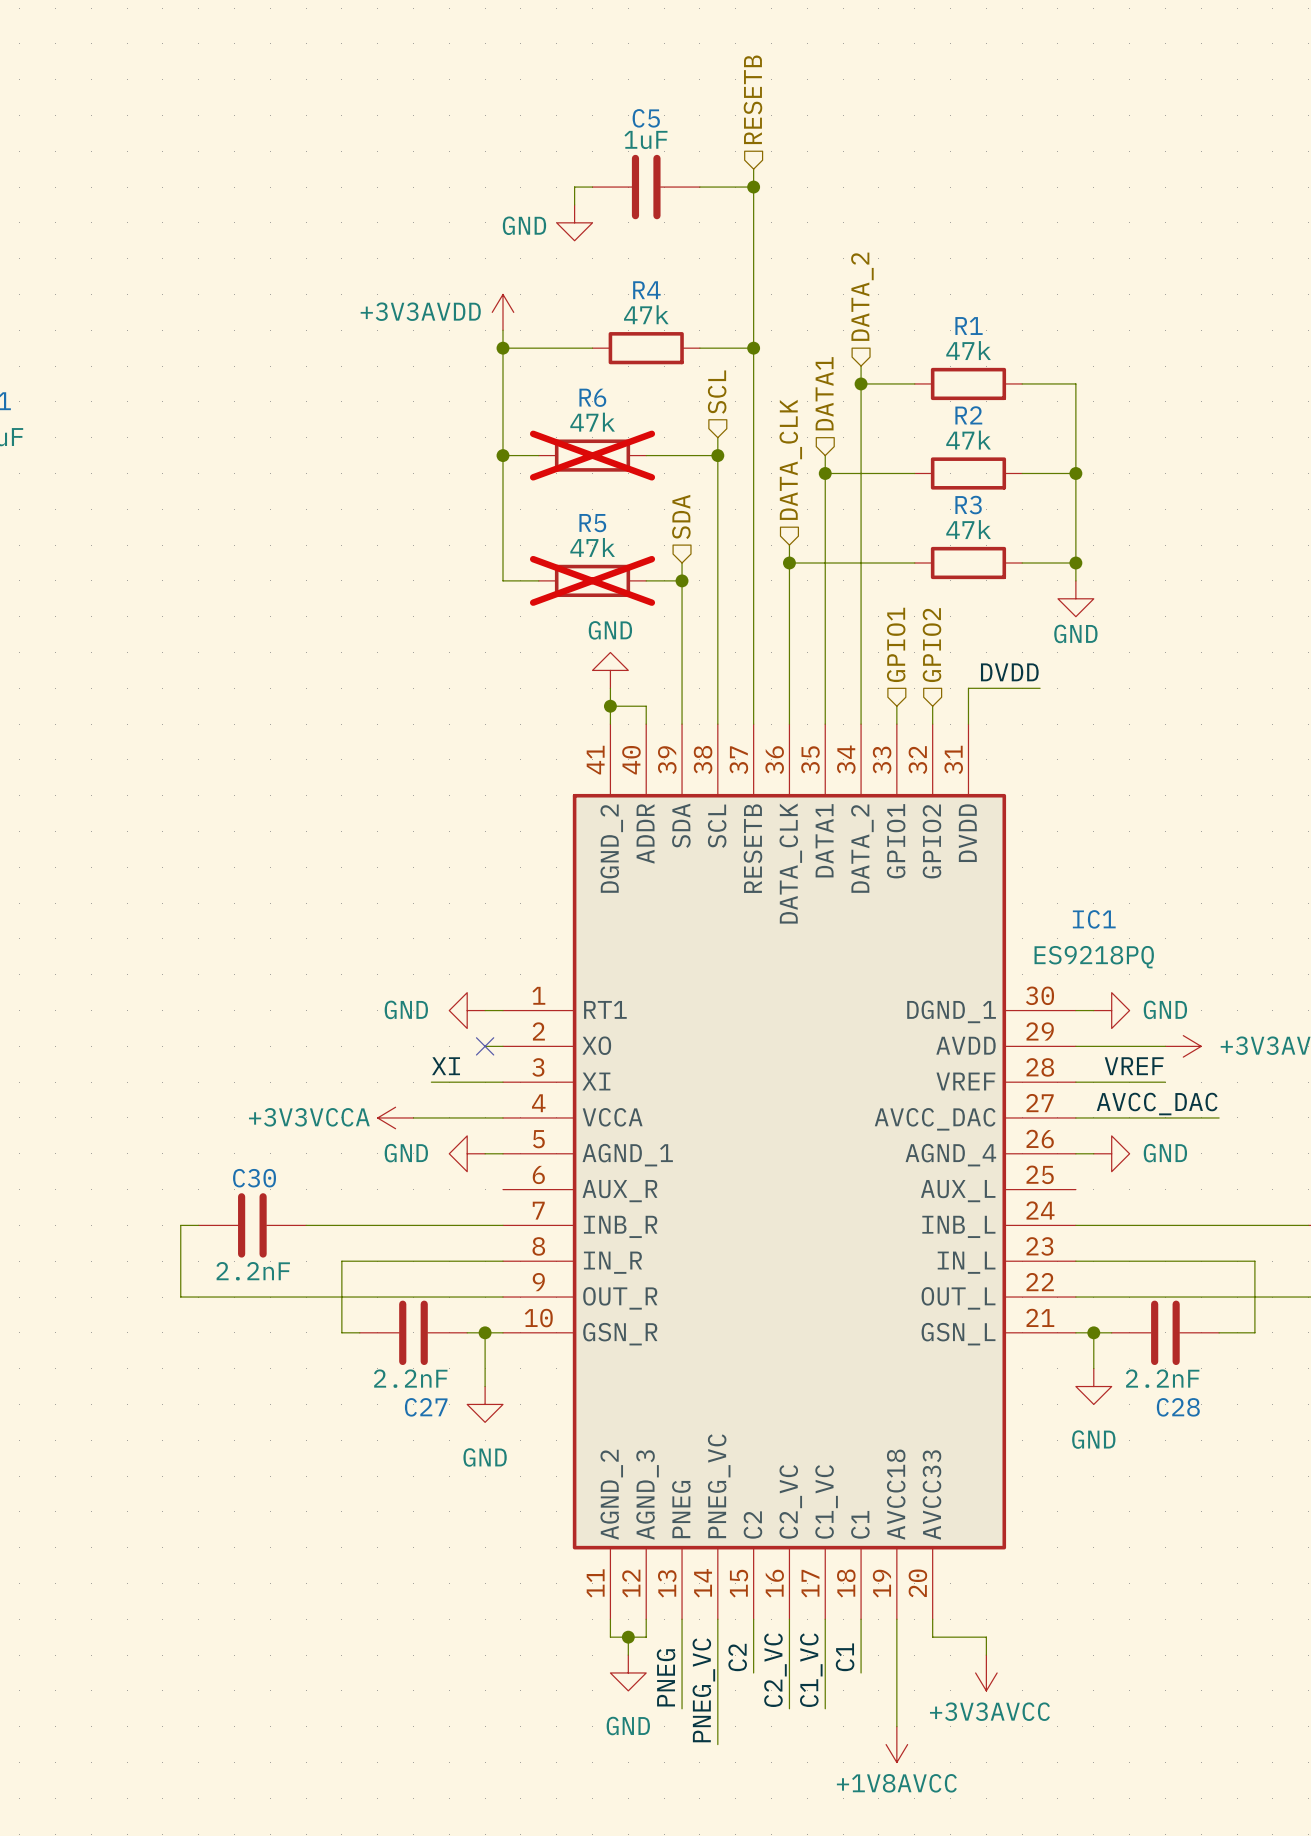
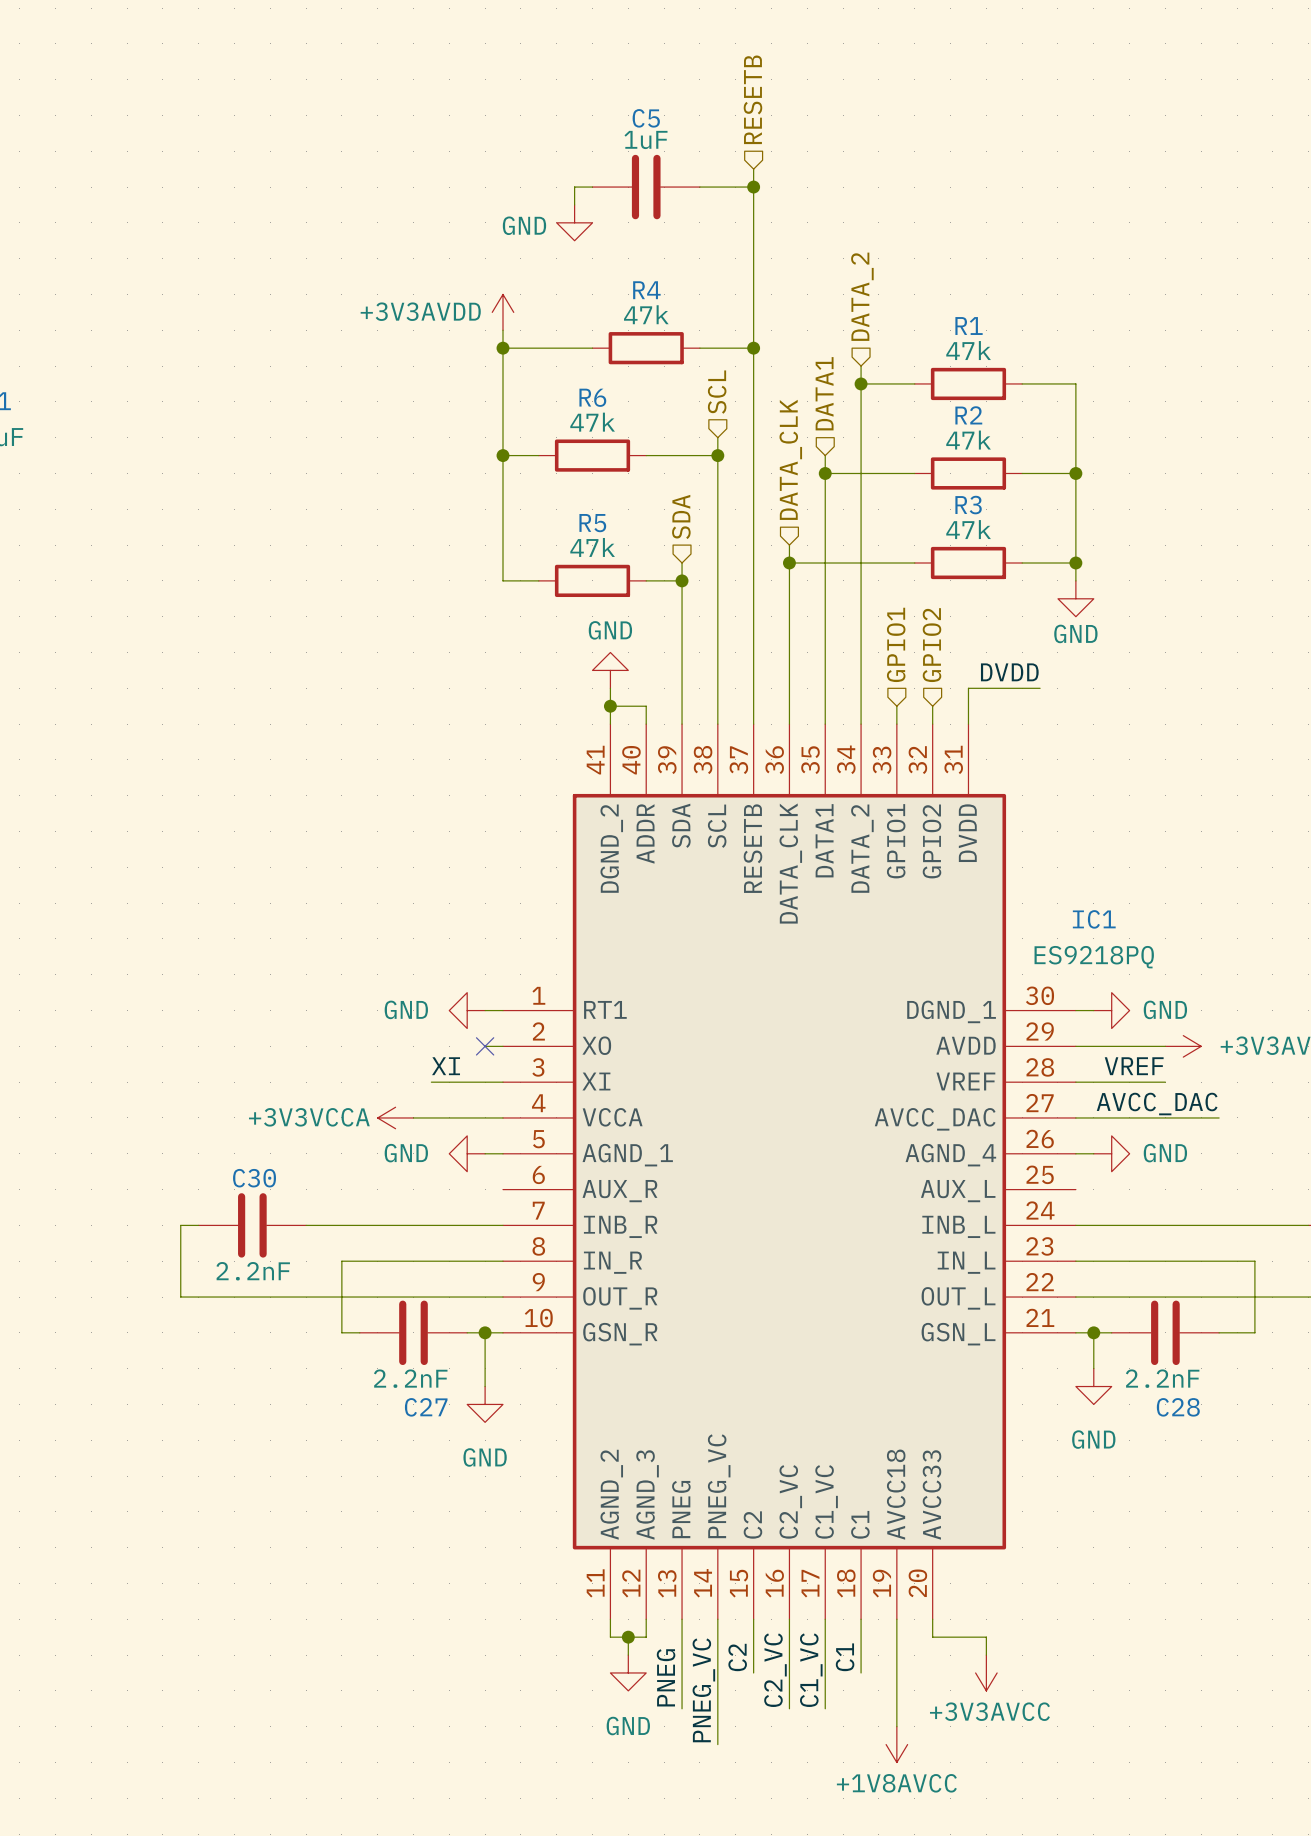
R6 do-not-place cross: (592, 455) -> none
R5 do-not-place cross: (592, 580) -> none

